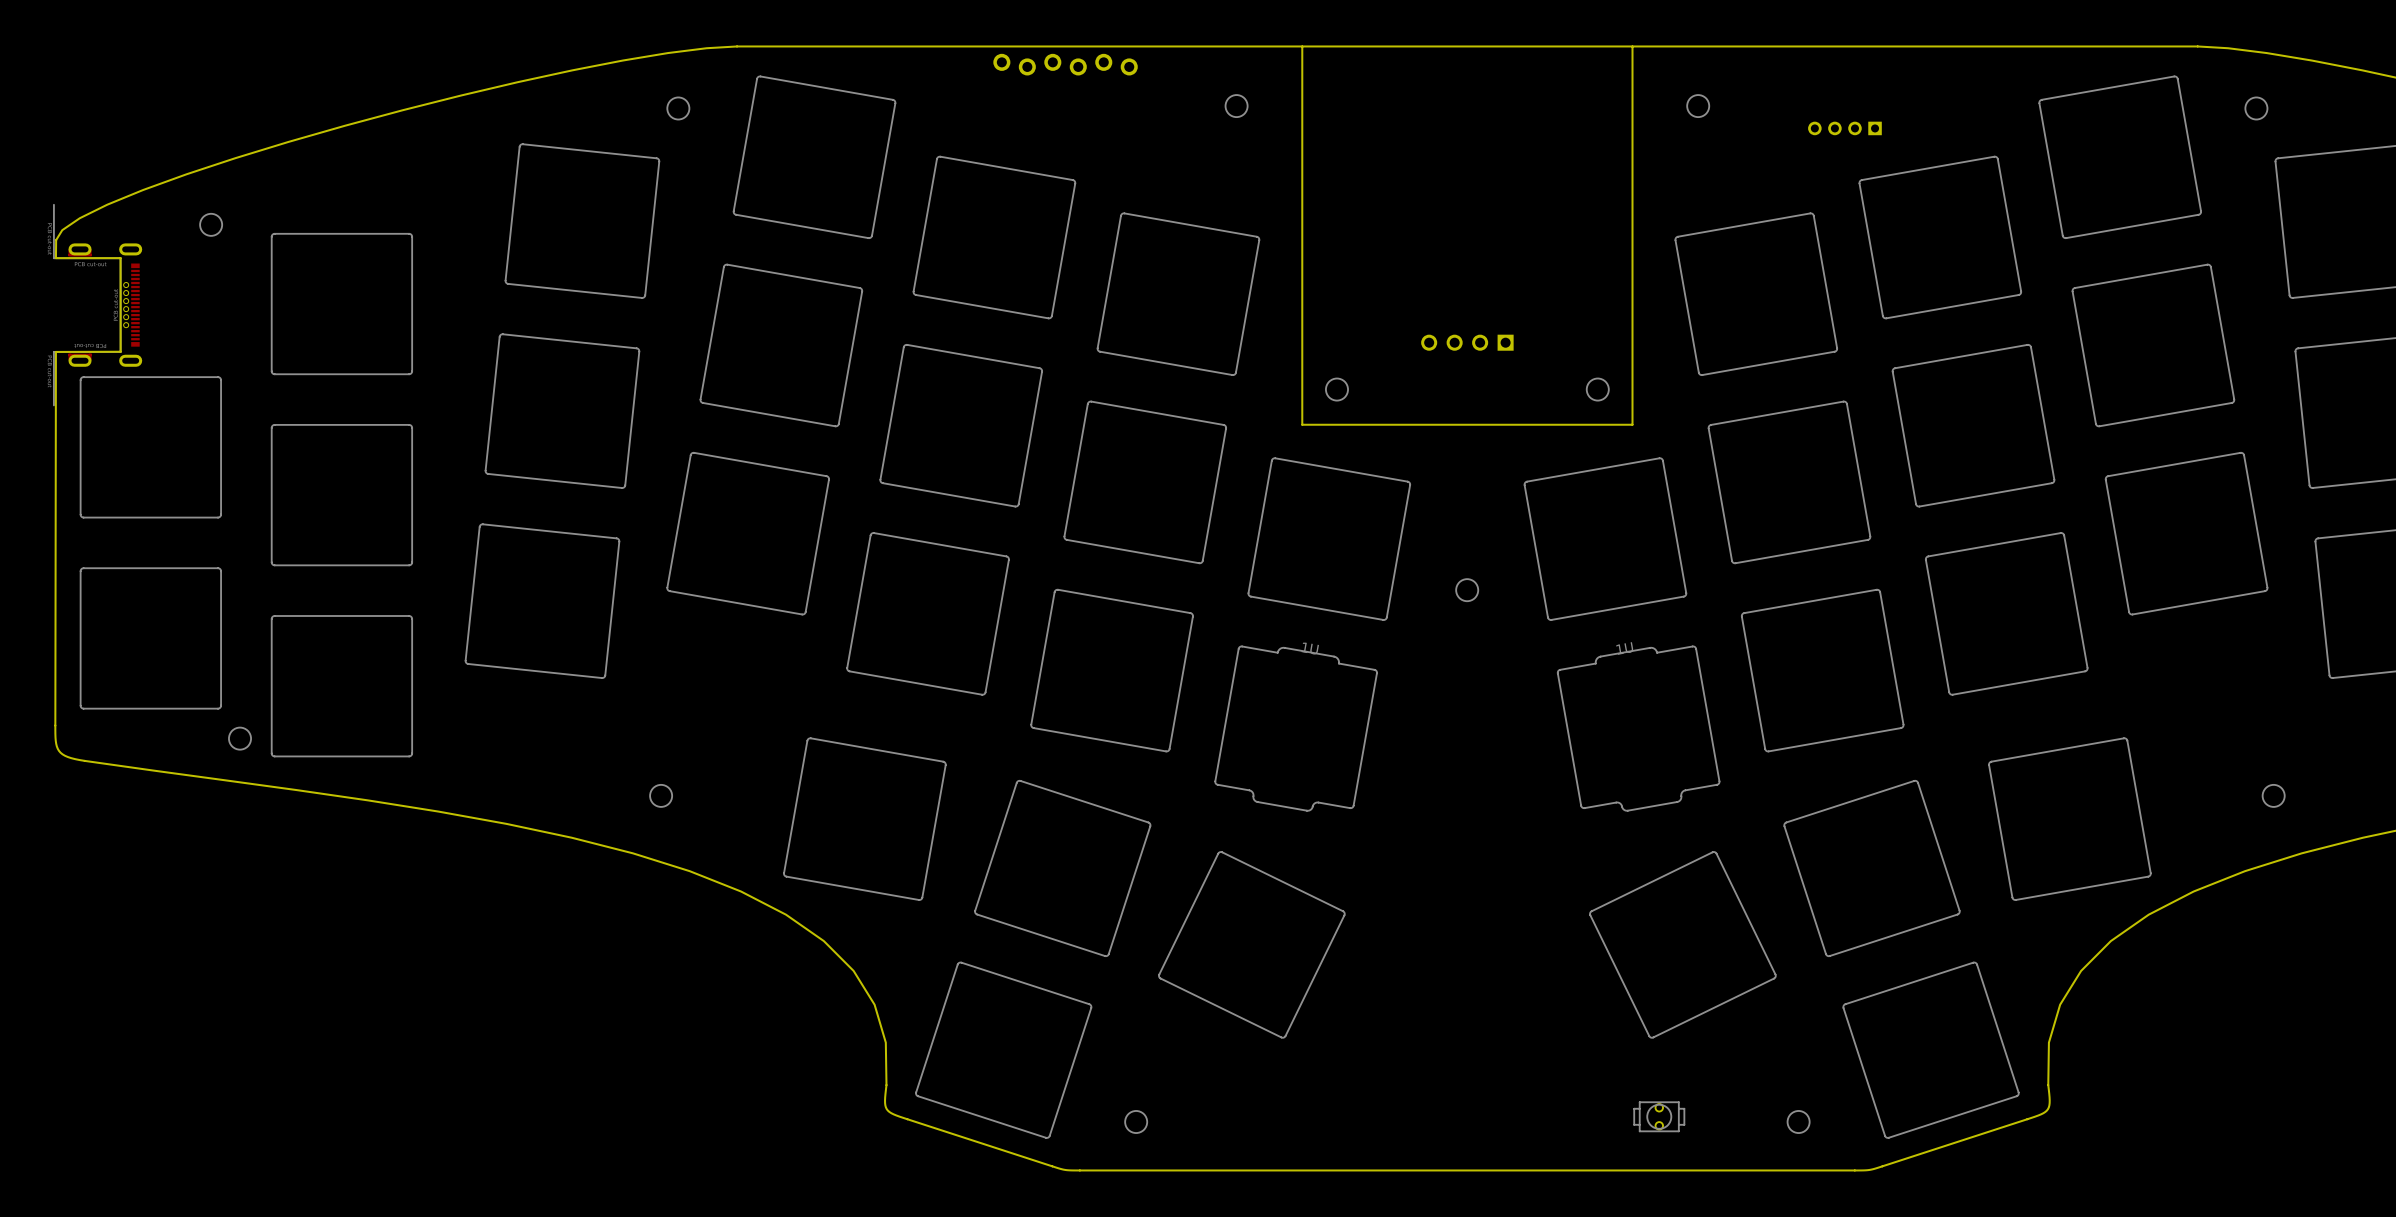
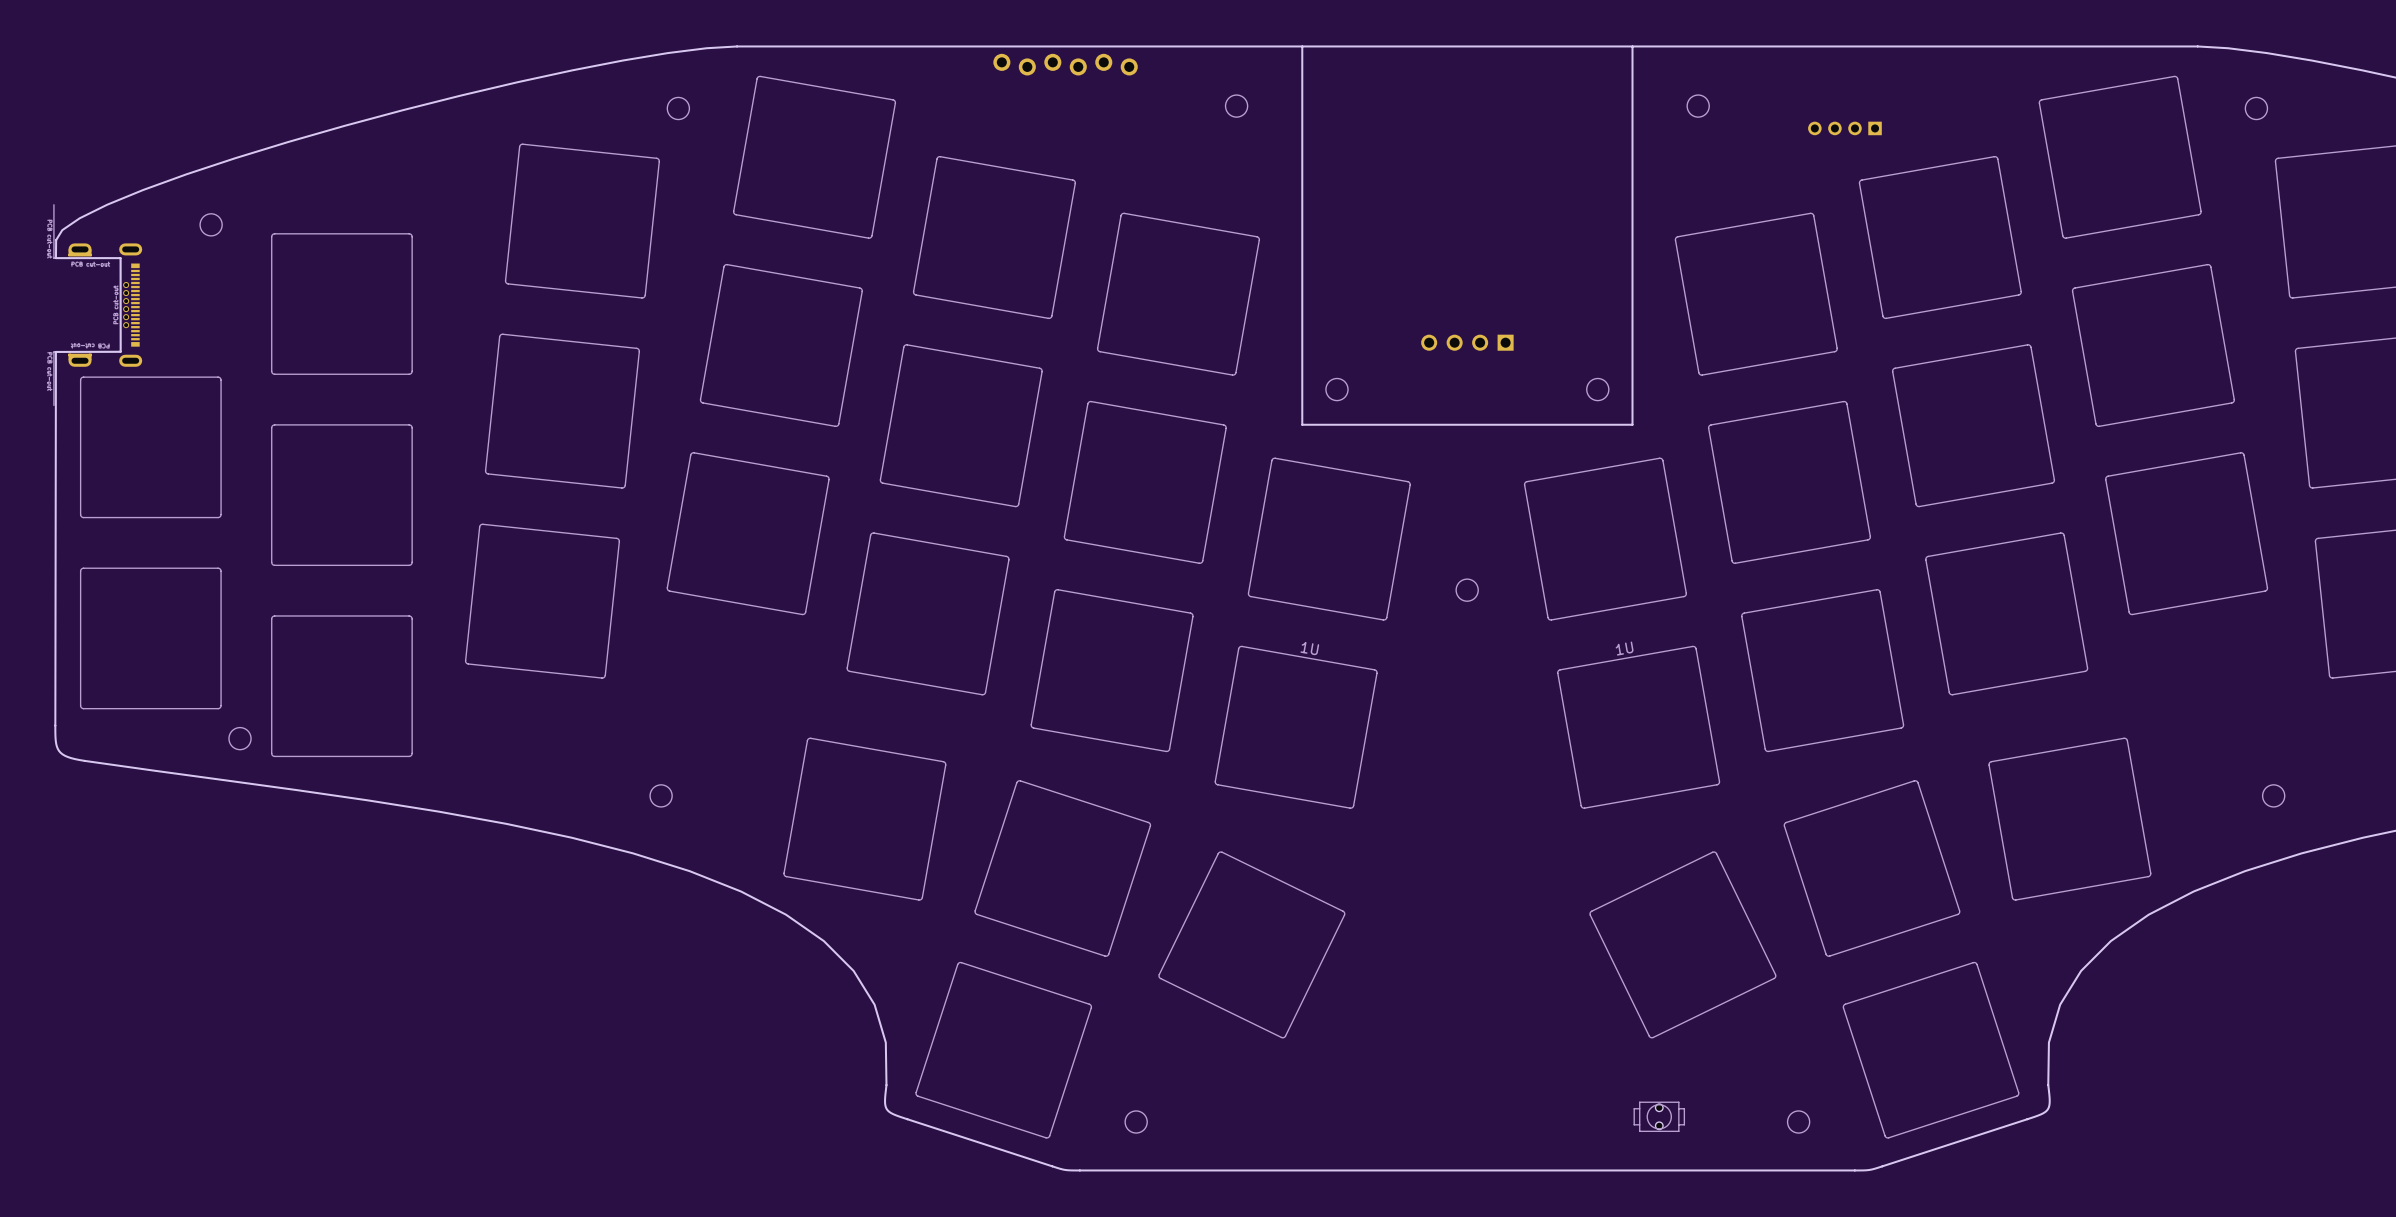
drawing shape: [1214, 642, 1378, 812] -> [1214, 641, 1378, 809]
drawing shape: [1557, 642, 1721, 812] -> [1557, 641, 1721, 809]

